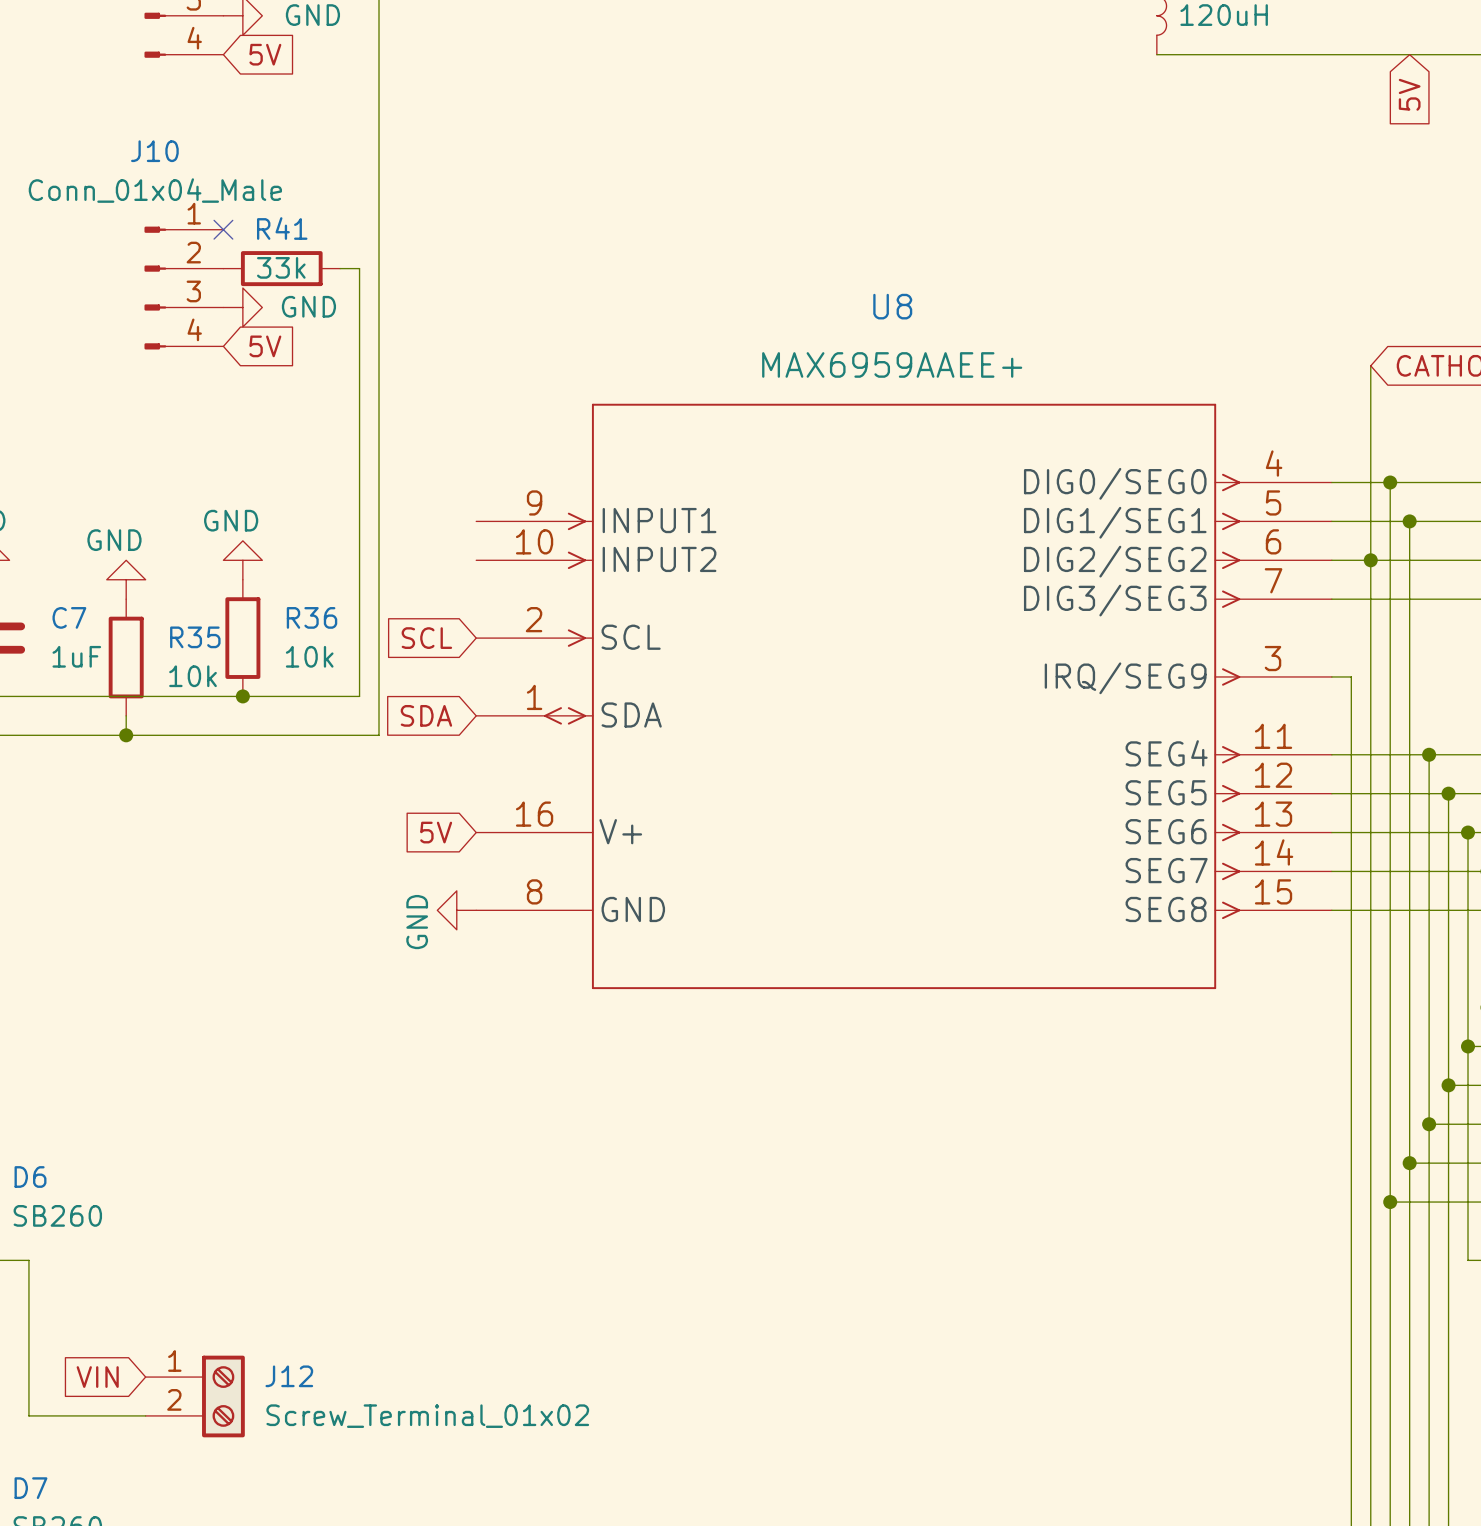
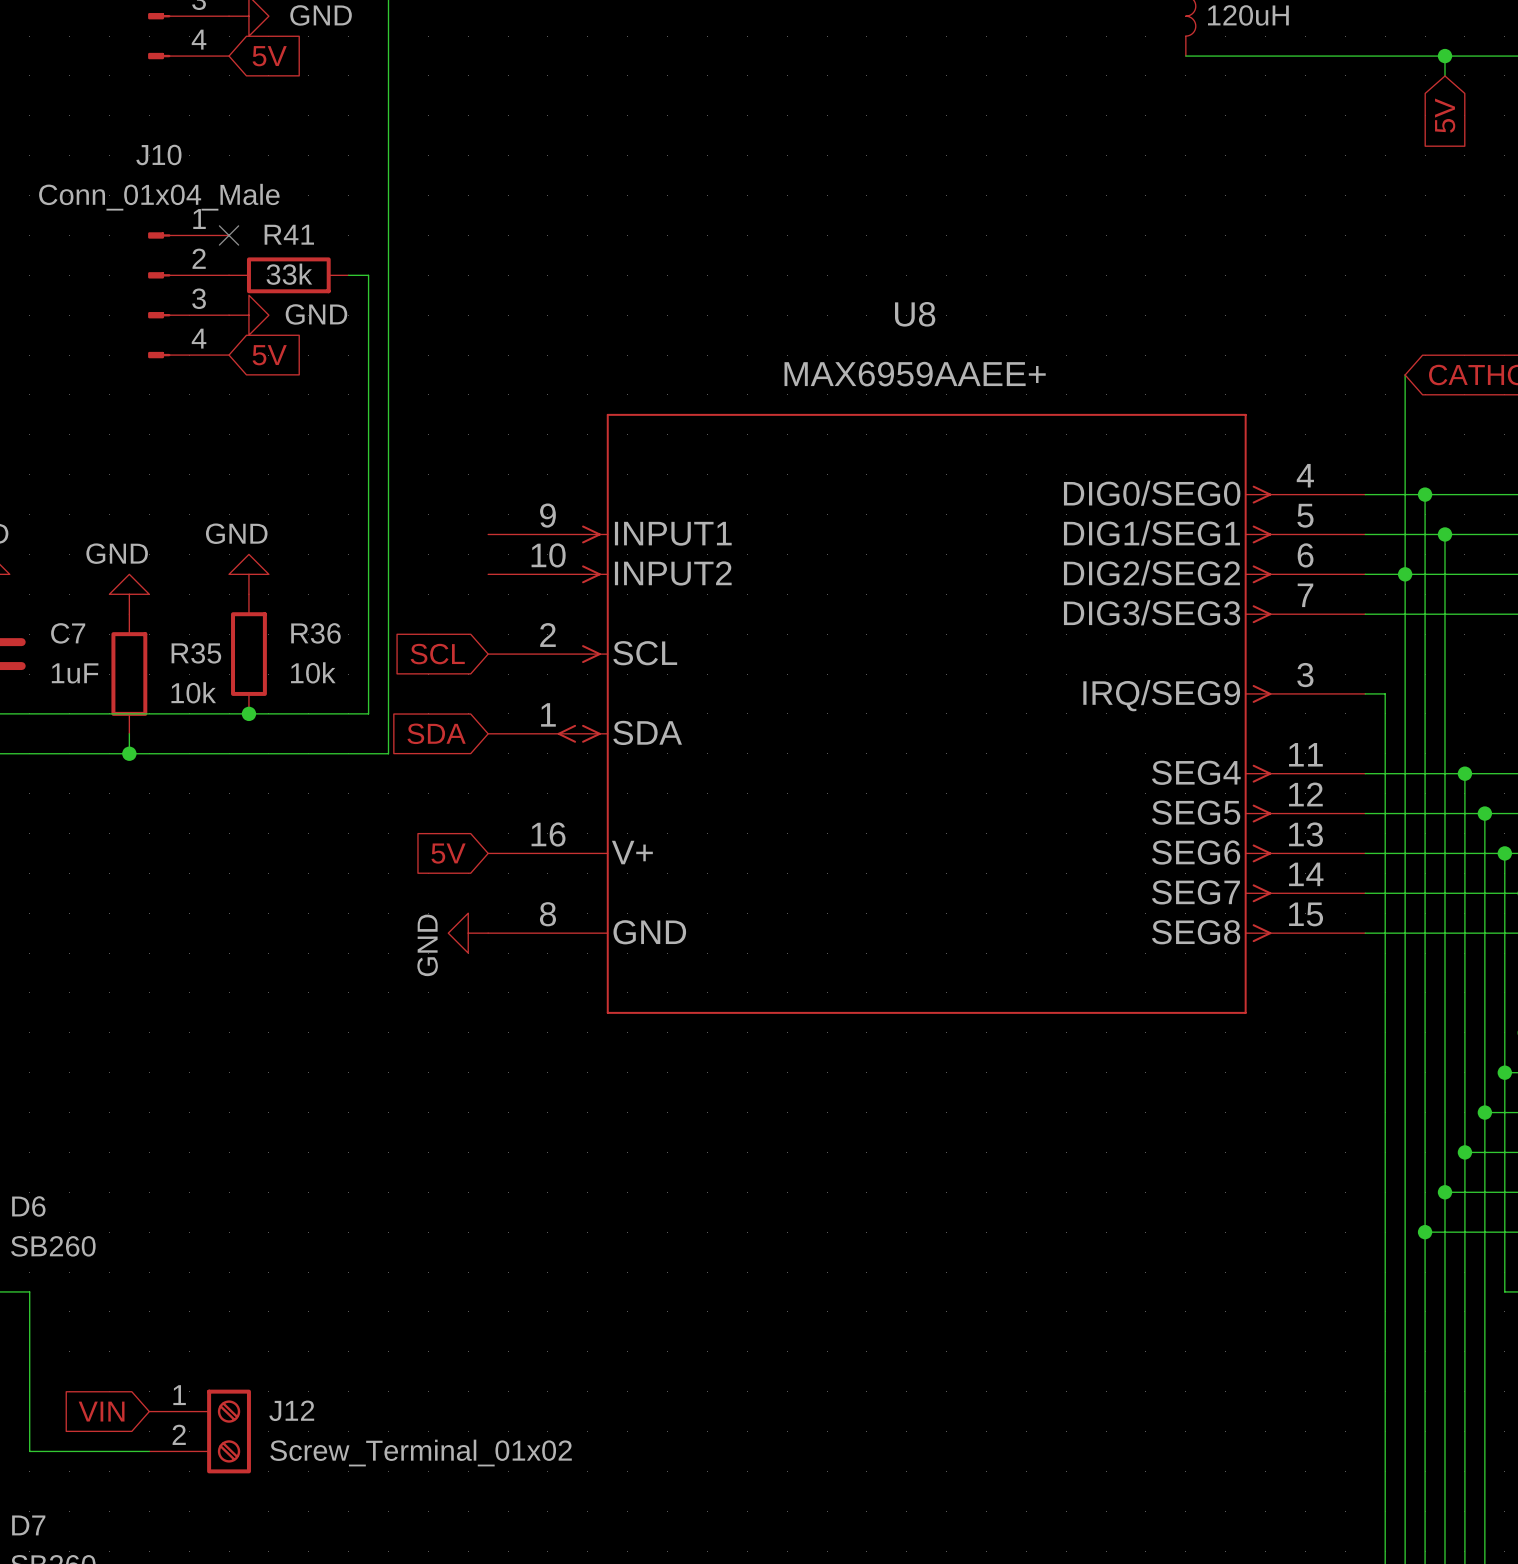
wire: none -> (1444, 56) (1444, 75)
junction: none -> (1444, 56)
global label position: 5V (1409, 94) -> 5V (1445, 115)

